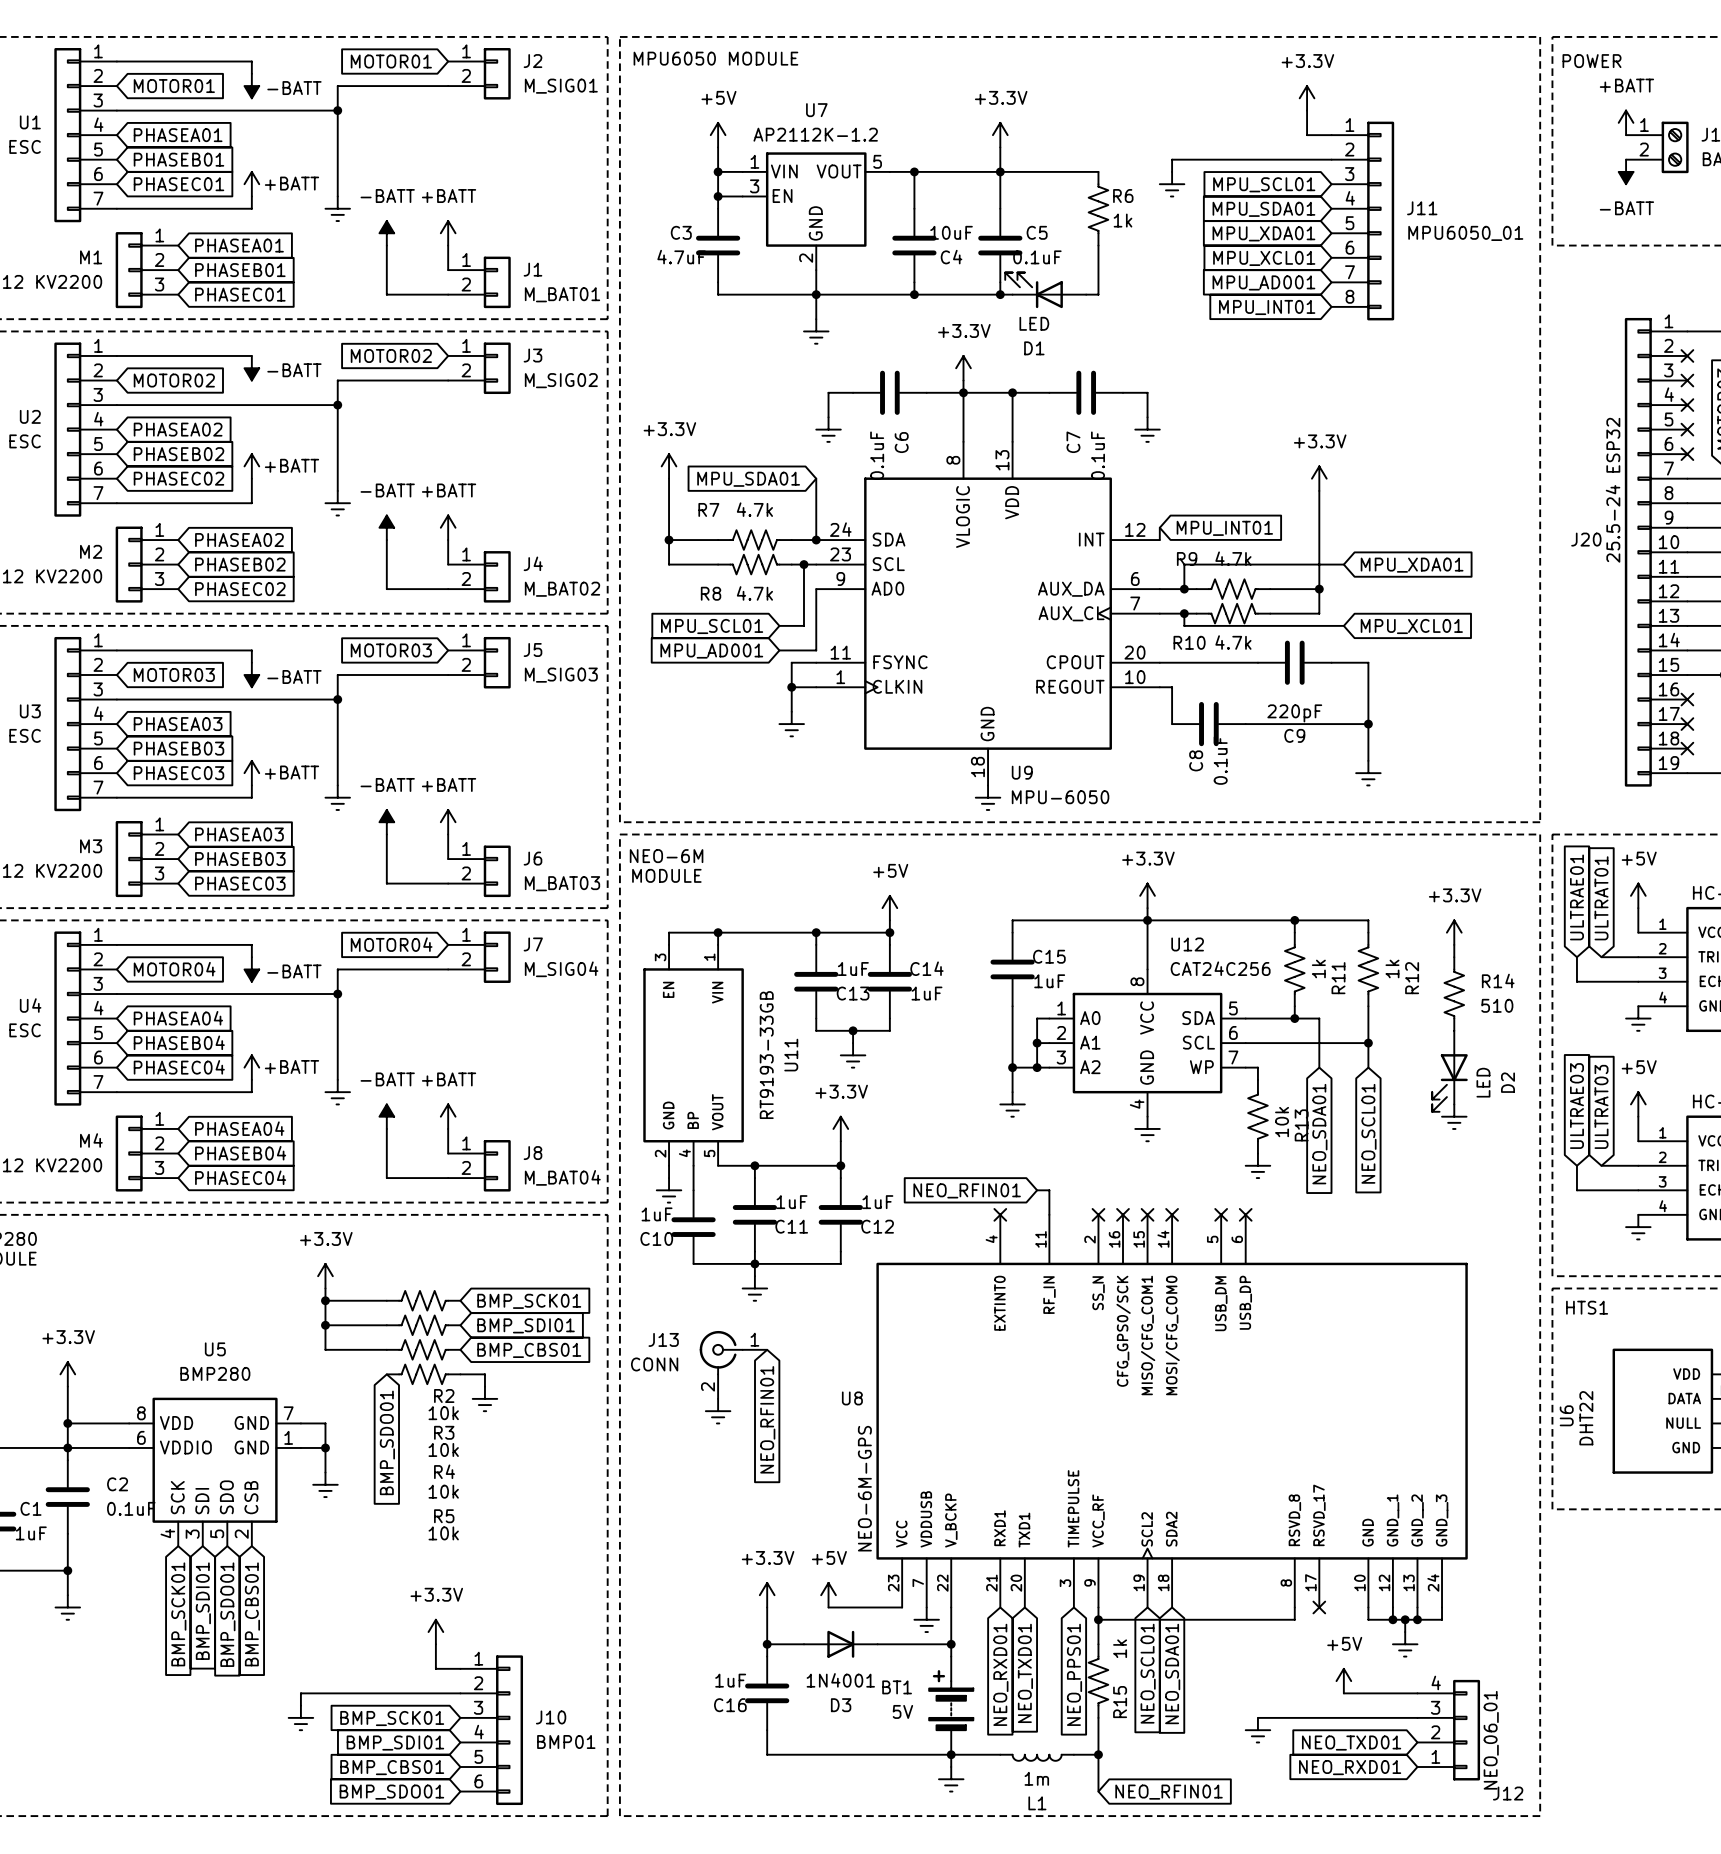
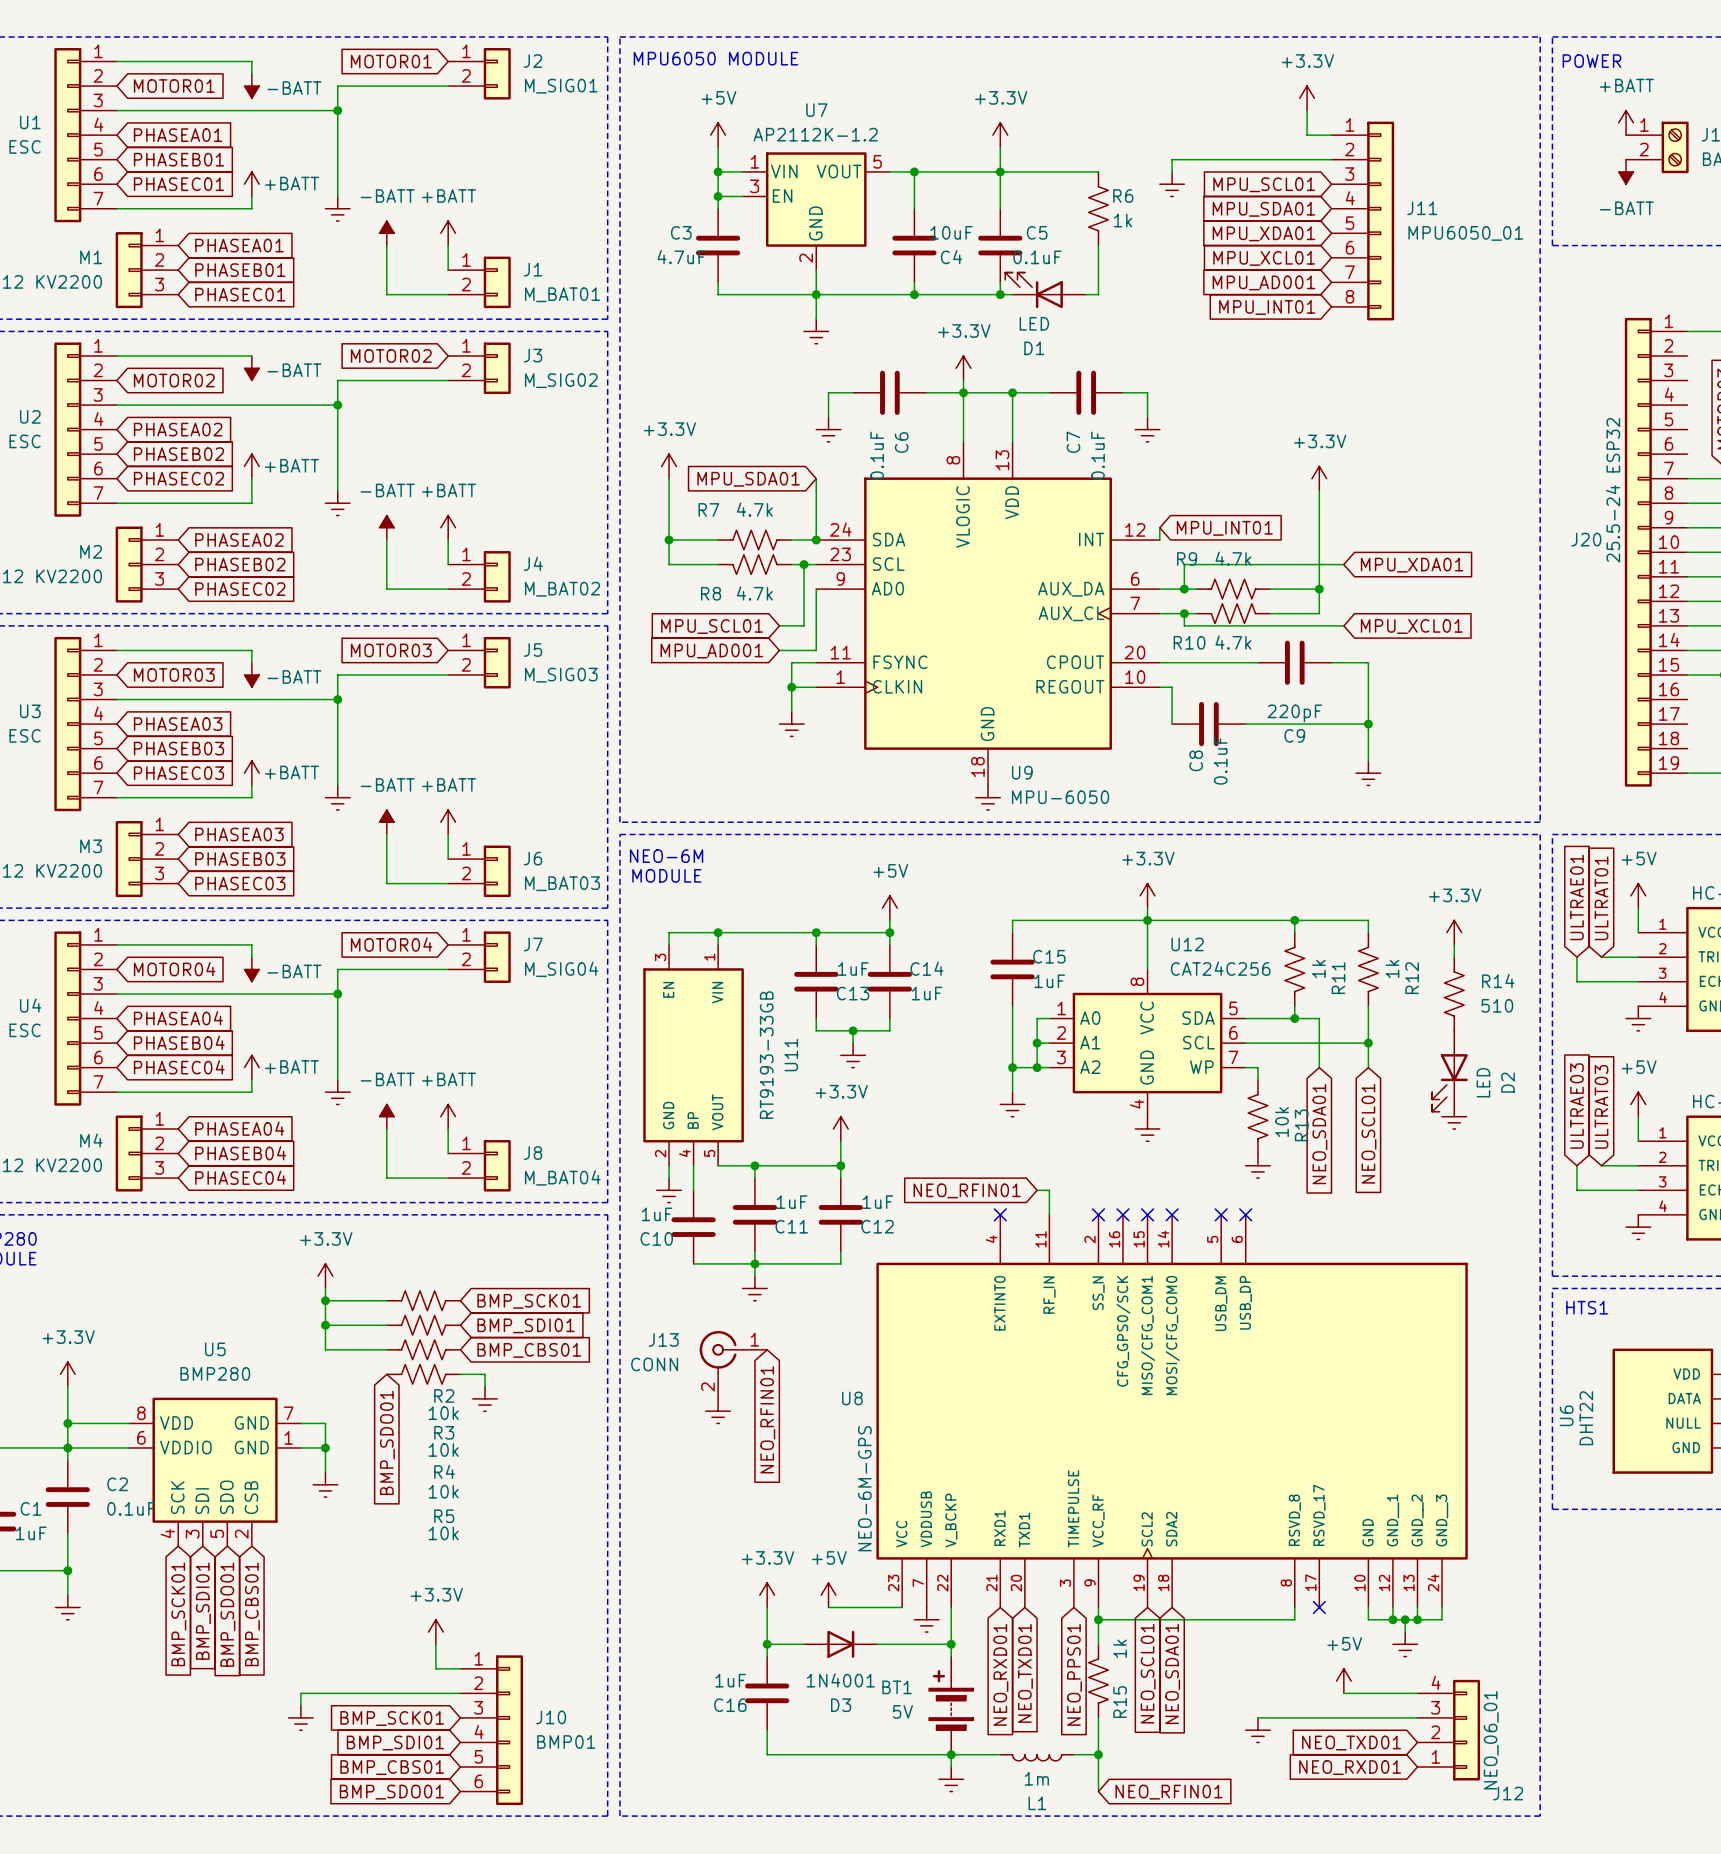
no-connect mark: (1687, 355) -> none
no-connect mark: (1687, 380) -> none
no-connect mark: (1687, 405) -> none
no-connect mark: (1687, 429) -> none
no-connect mark: (1687, 454) -> none
no-connect mark: (1687, 699) -> none
no-connect mark: (1687, 724) -> none
no-connect mark: (1687, 748) -> none

